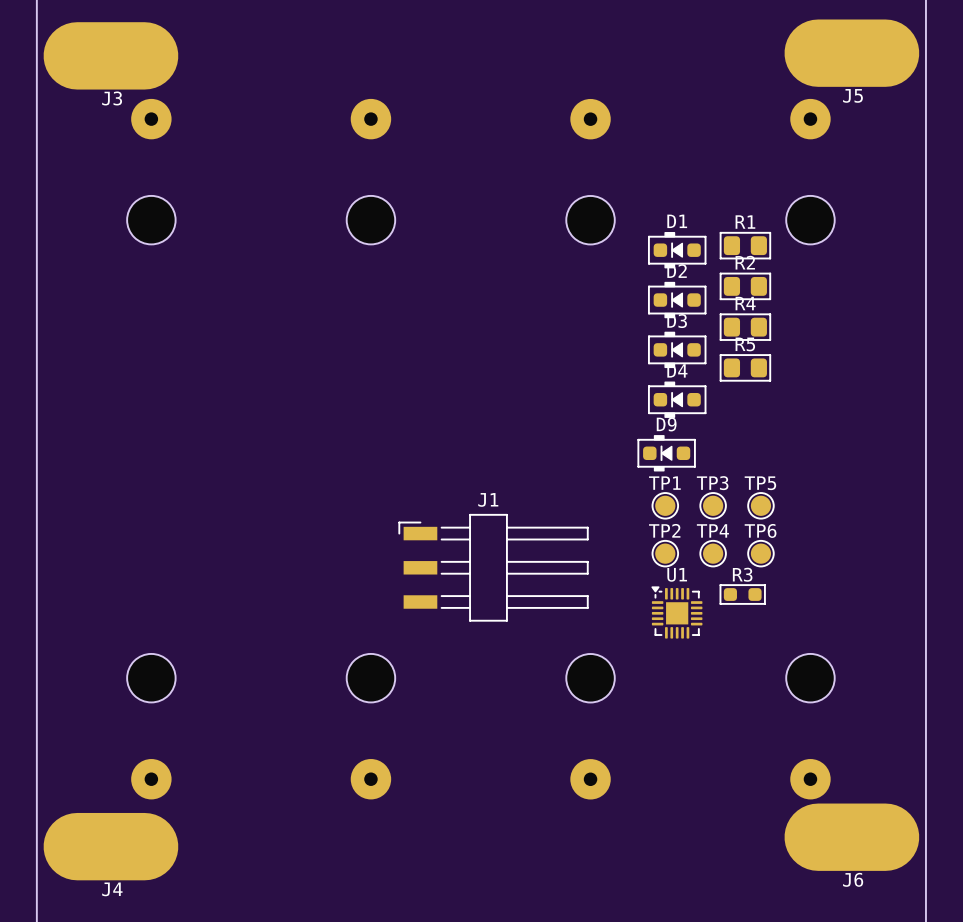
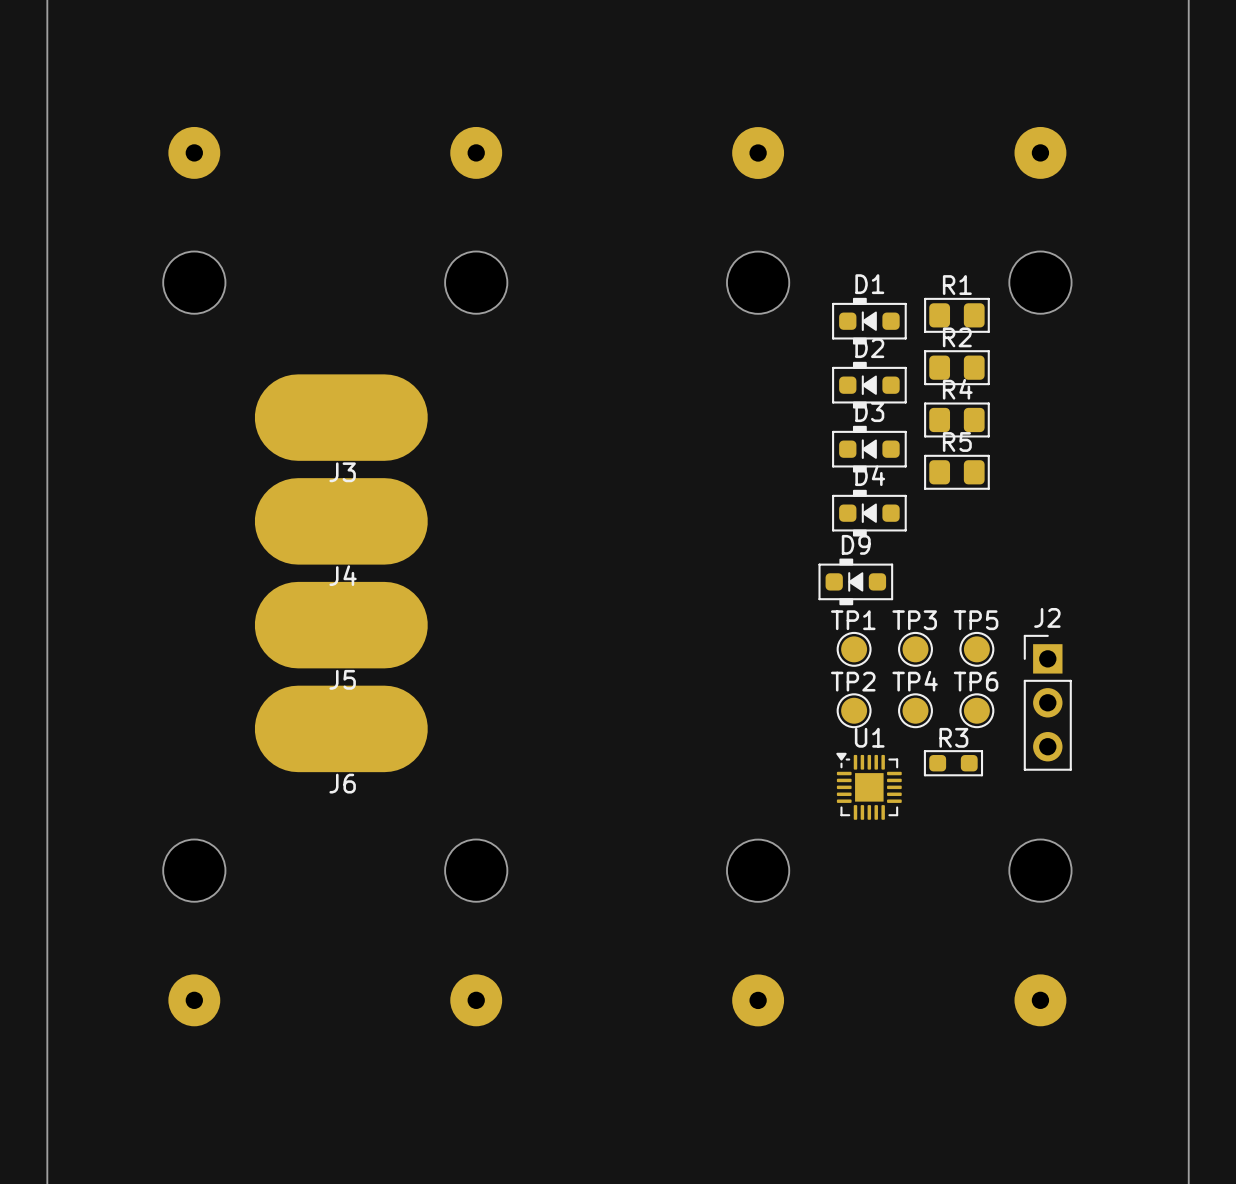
J5 position: (851, 53) -> (341, 625)
J3 position: (110, 55) -> (341, 417)
J2: none -> (1047, 702)
J1: (493, 567) -> none
J6 position: (851, 837) -> (341, 728)
J4 position: (110, 846) -> (341, 521)

